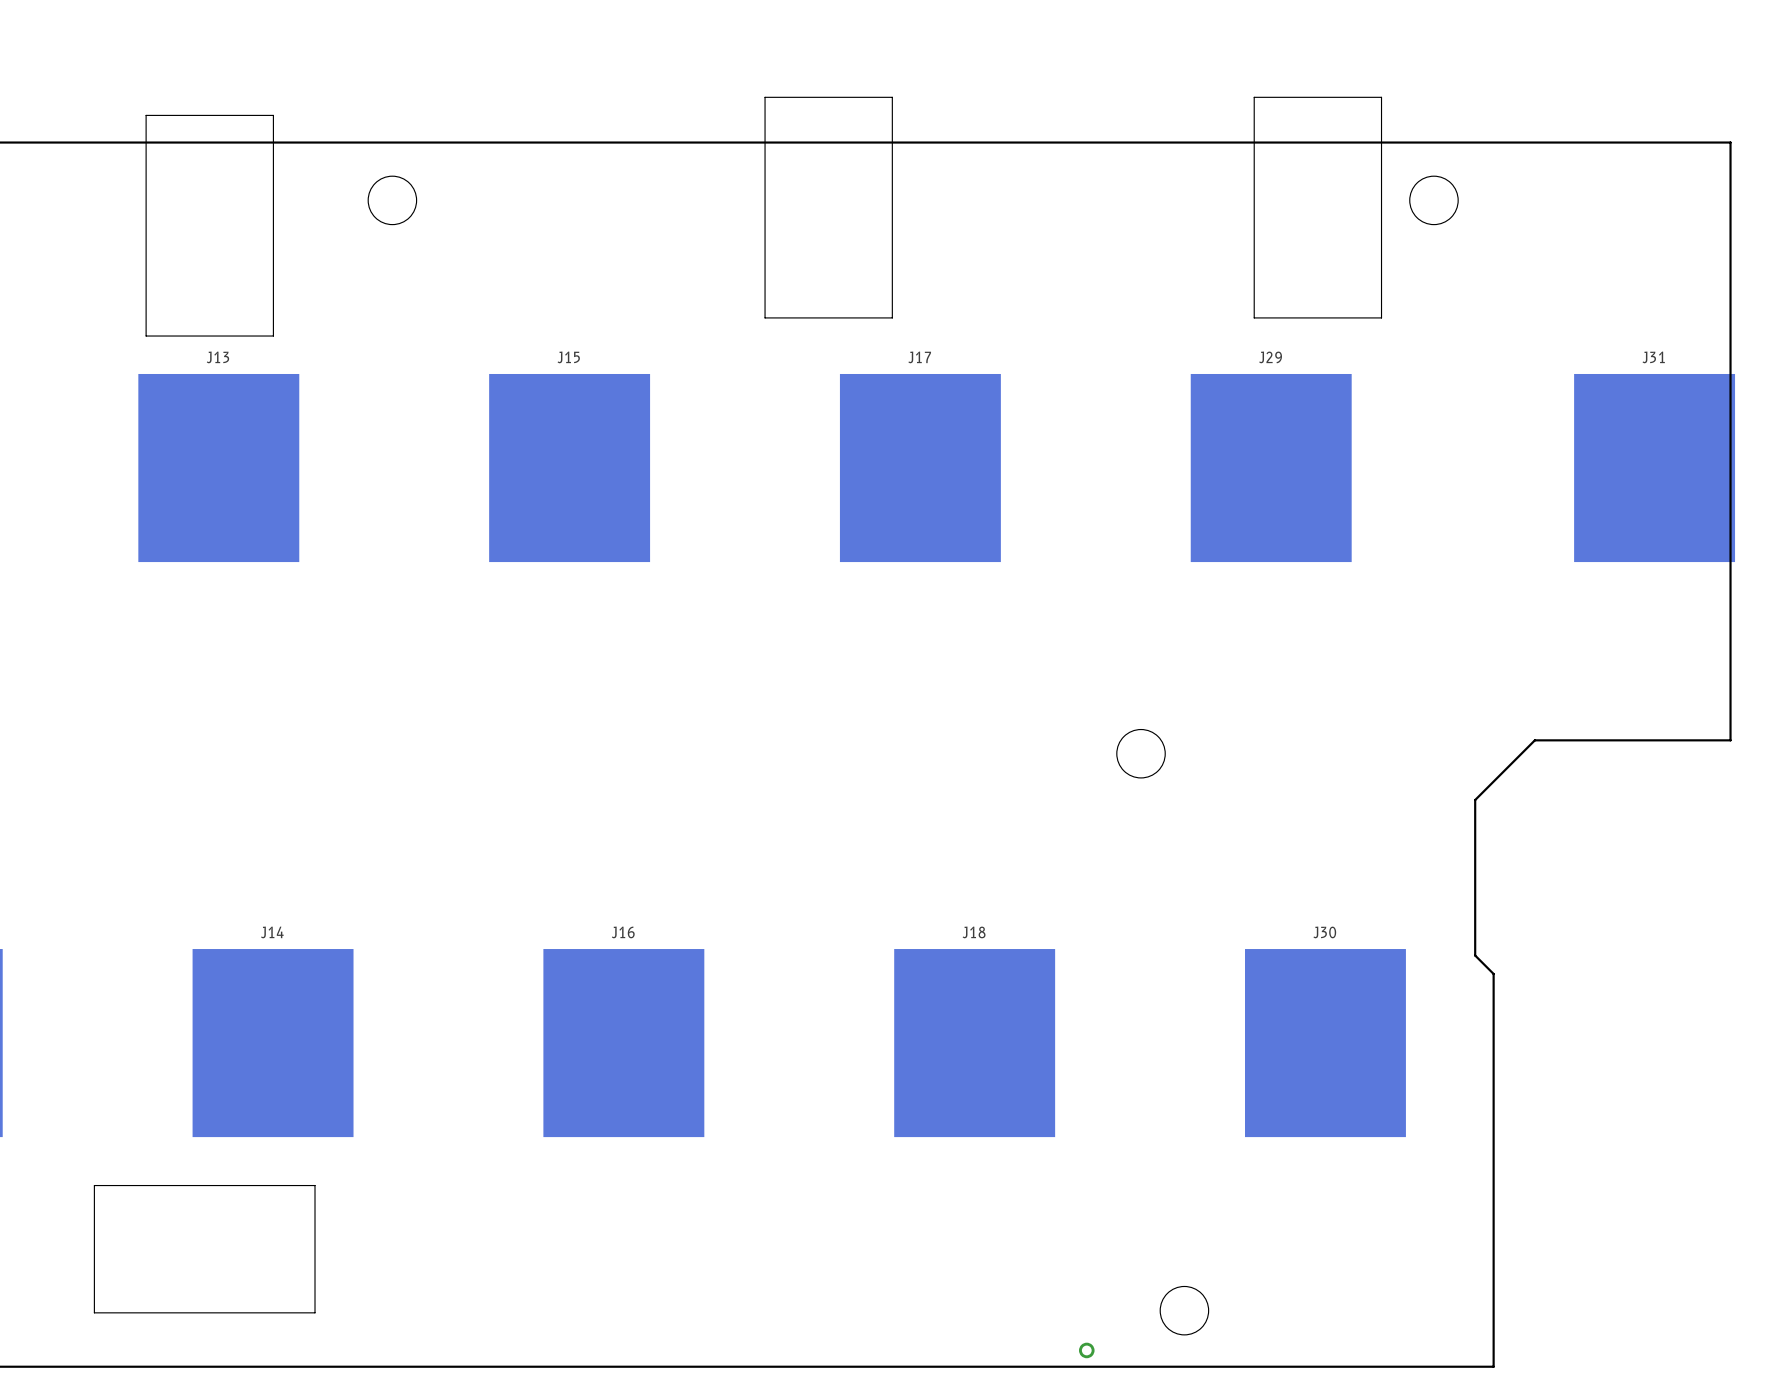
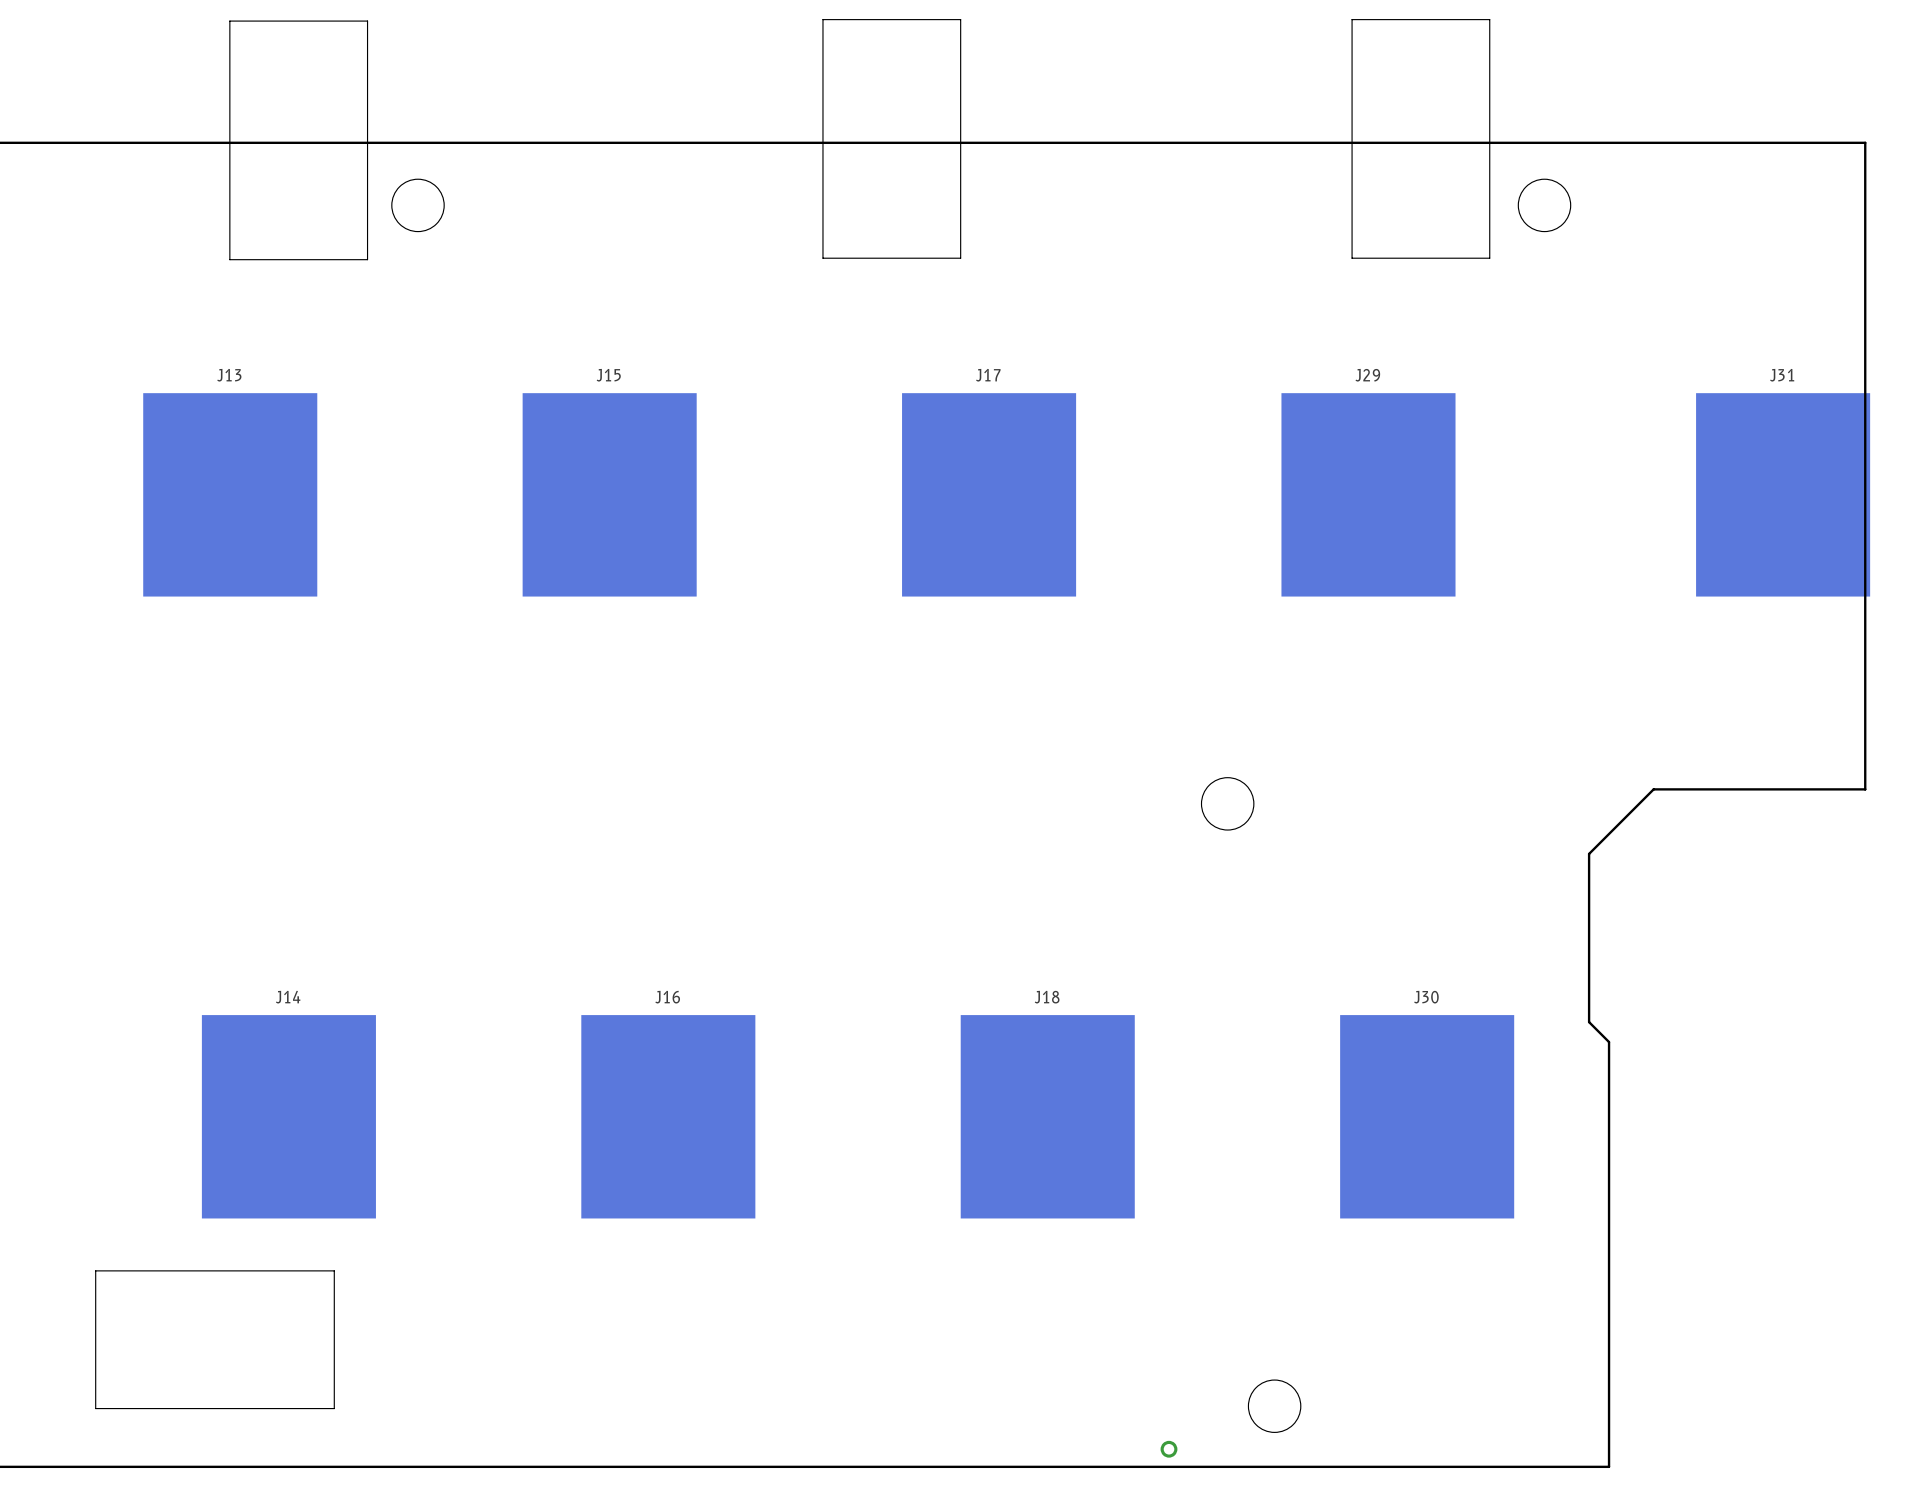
part position: (828, 207) -> (891, 138)
part position: (1317, 207) -> (1420, 138)
part position: (209, 225) -> (298, 140)

